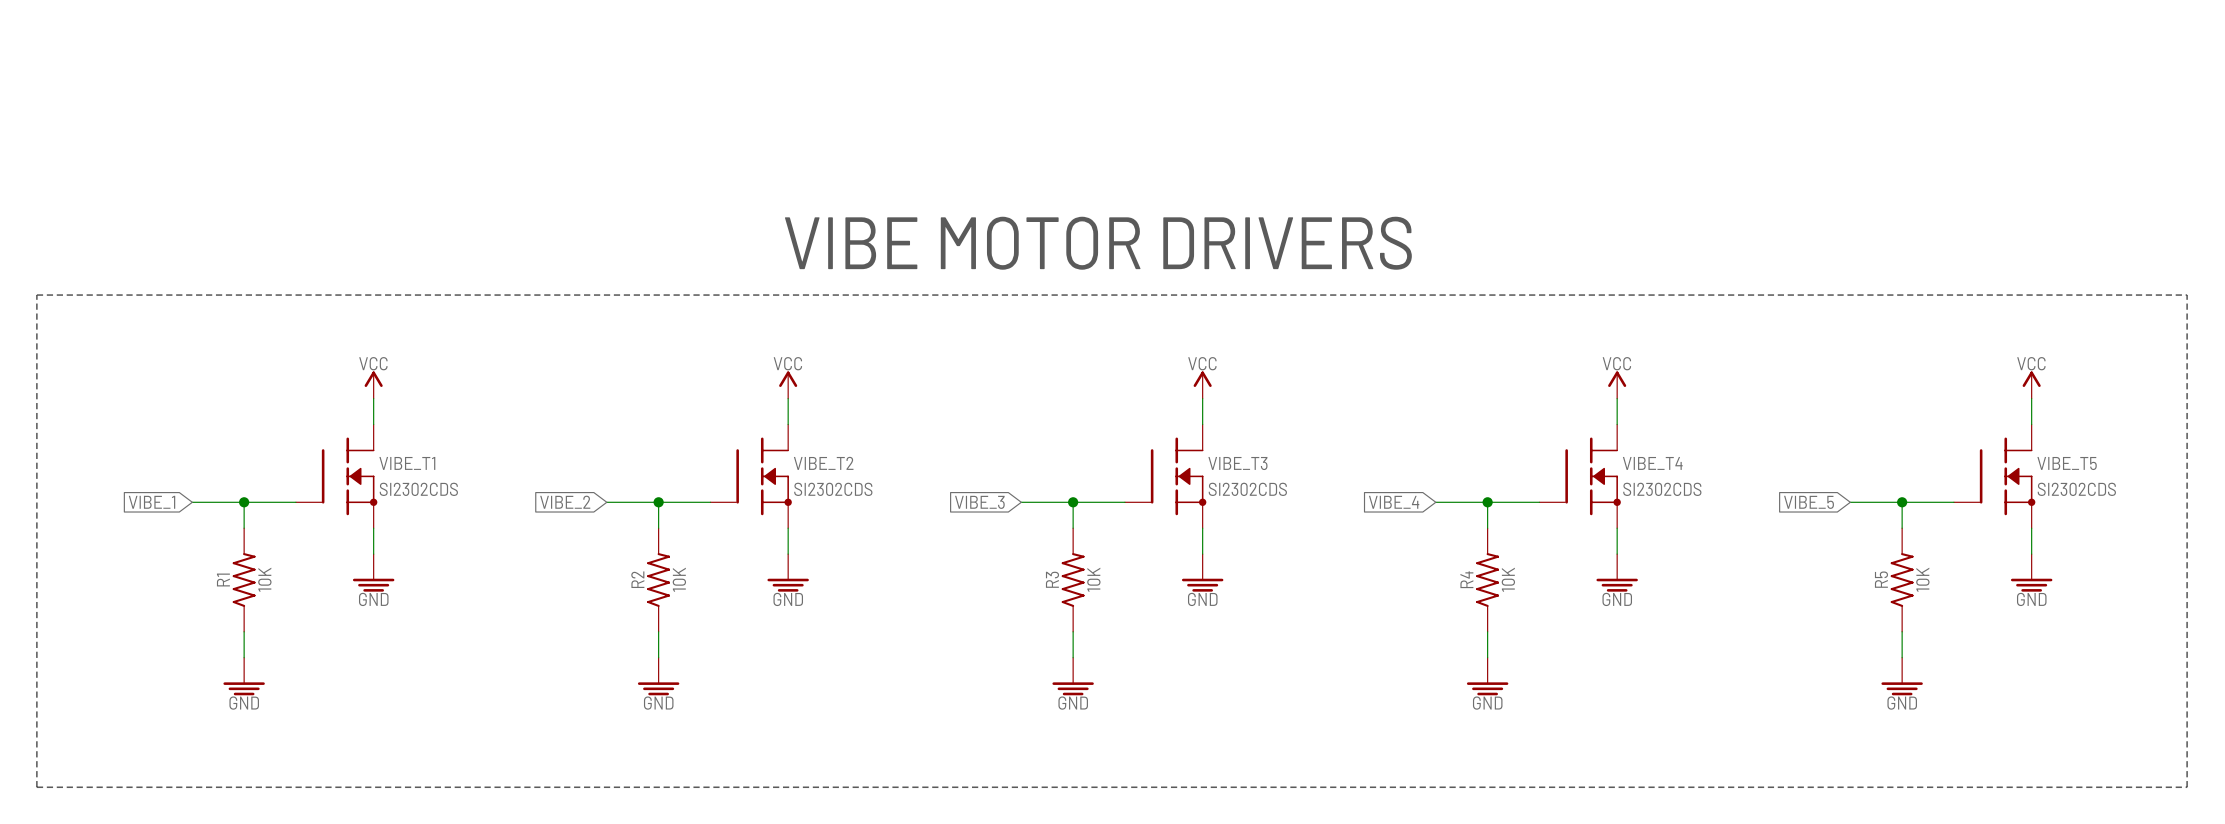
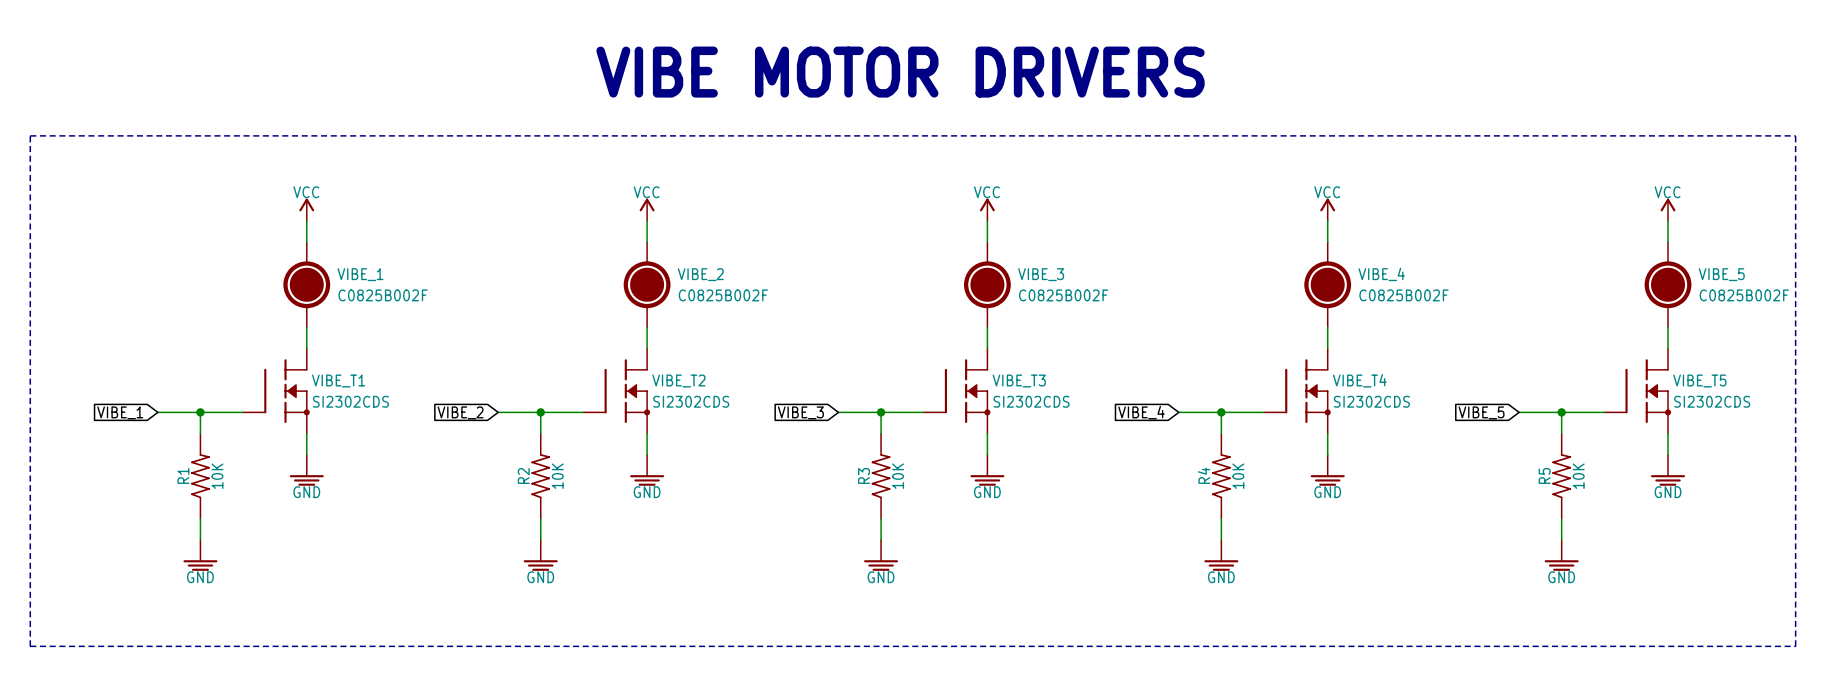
text position: VIBE MOTOR DRIVERS (1098, 243) -> VIBE MOTOR DRIVERS (900, 72)
wire: none -> (306, 220) (306, 242)
wire: none -> (647, 220) (647, 242)
wire: none -> (987, 220) (987, 242)
wire: none -> (1327, 220) (1327, 242)
wire: none -> (1668, 220) (1668, 242)
line: (36, 295) (2187, 295) -> (30, 242) (30, 135) (1795, 135) (1795, 242)
VIBE_1: none -> (306, 284)
VIBE_2: none -> (647, 284)
VIBE_3: none -> (987, 284)
VIBE_4: none -> (1327, 284)
VIBE_5: none -> (1668, 284)
power symbol position: (373, 385) -> (306, 209)
power symbol position: (788, 385) -> (647, 209)
power symbol position: (1202, 385) -> (987, 209)
power symbol position: (1617, 385) -> (1327, 209)
power symbol position: (2031, 385) -> (1668, 209)

